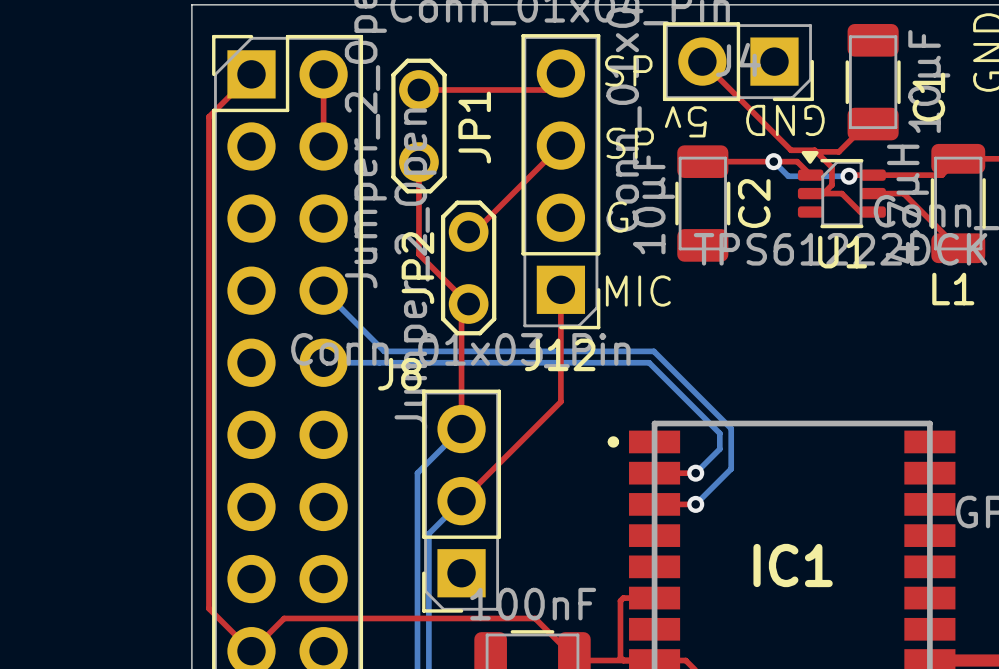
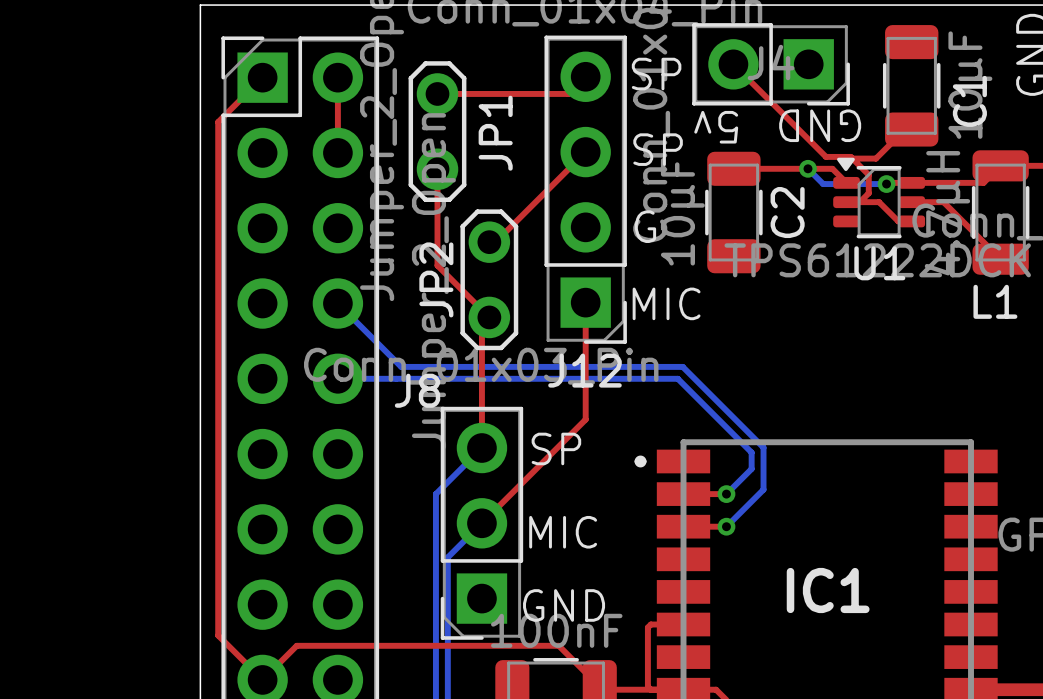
text: none -> SP (556, 448)
text: none -> MIC (563, 532)
text: none -> GND (564, 605)

